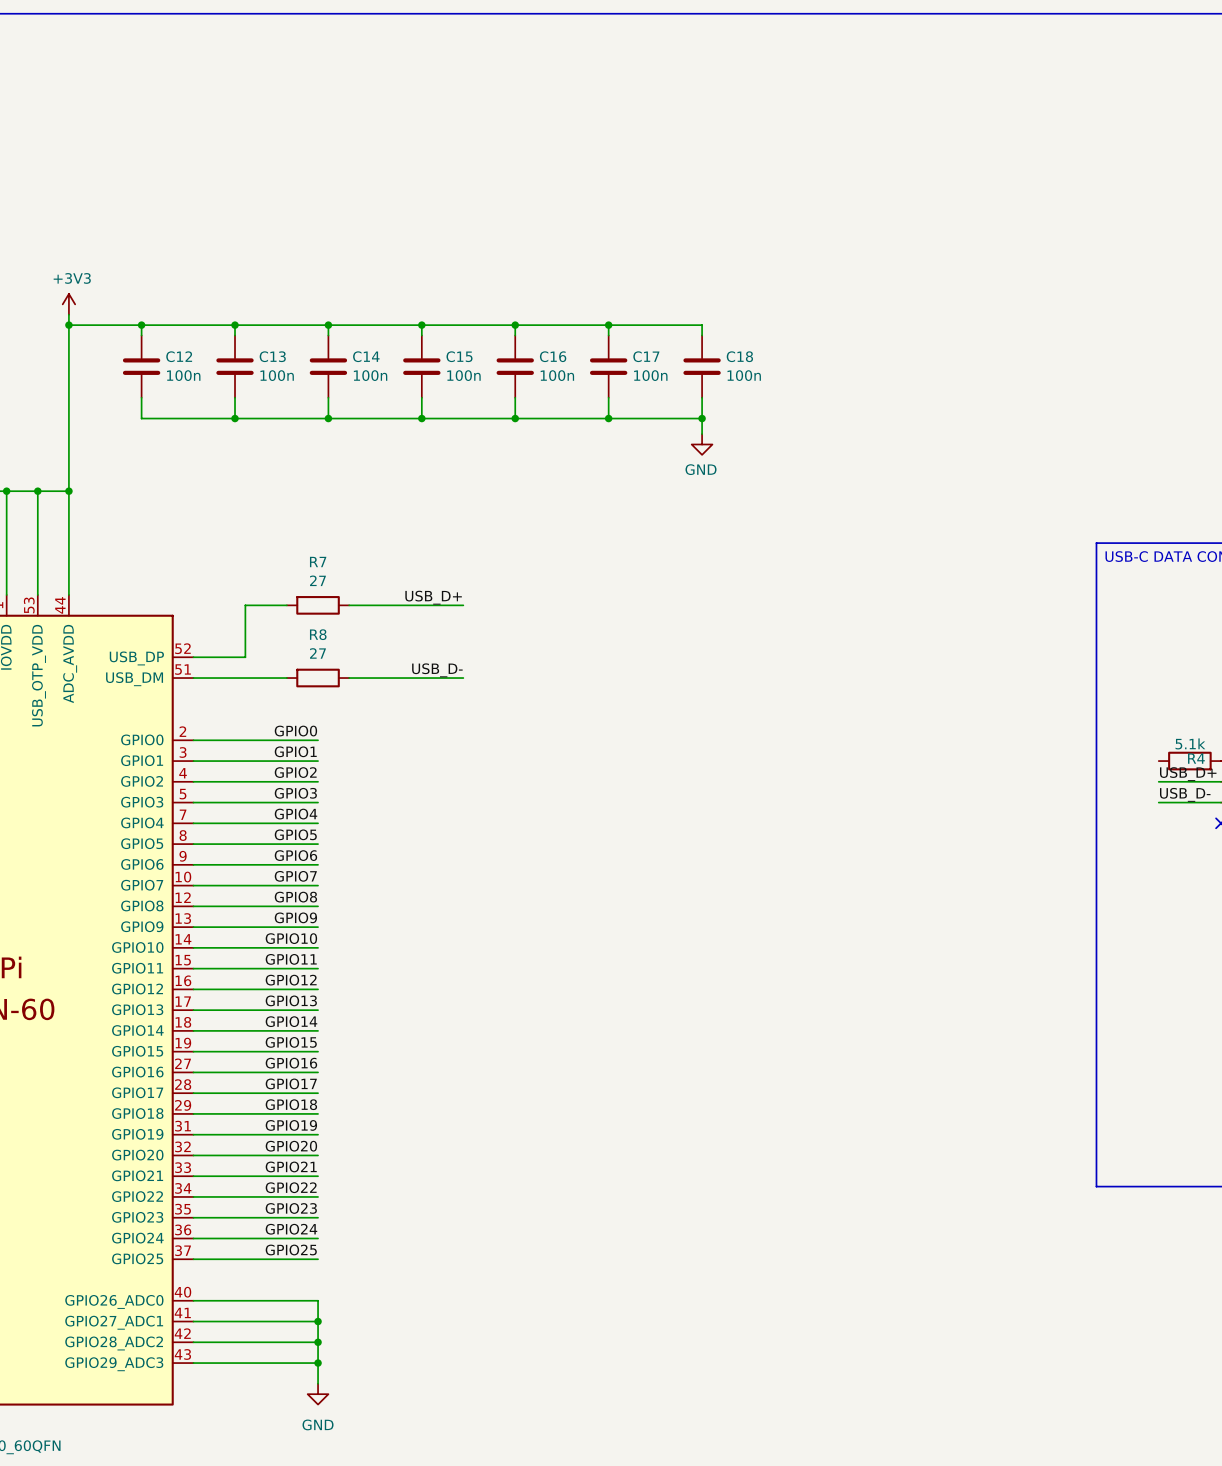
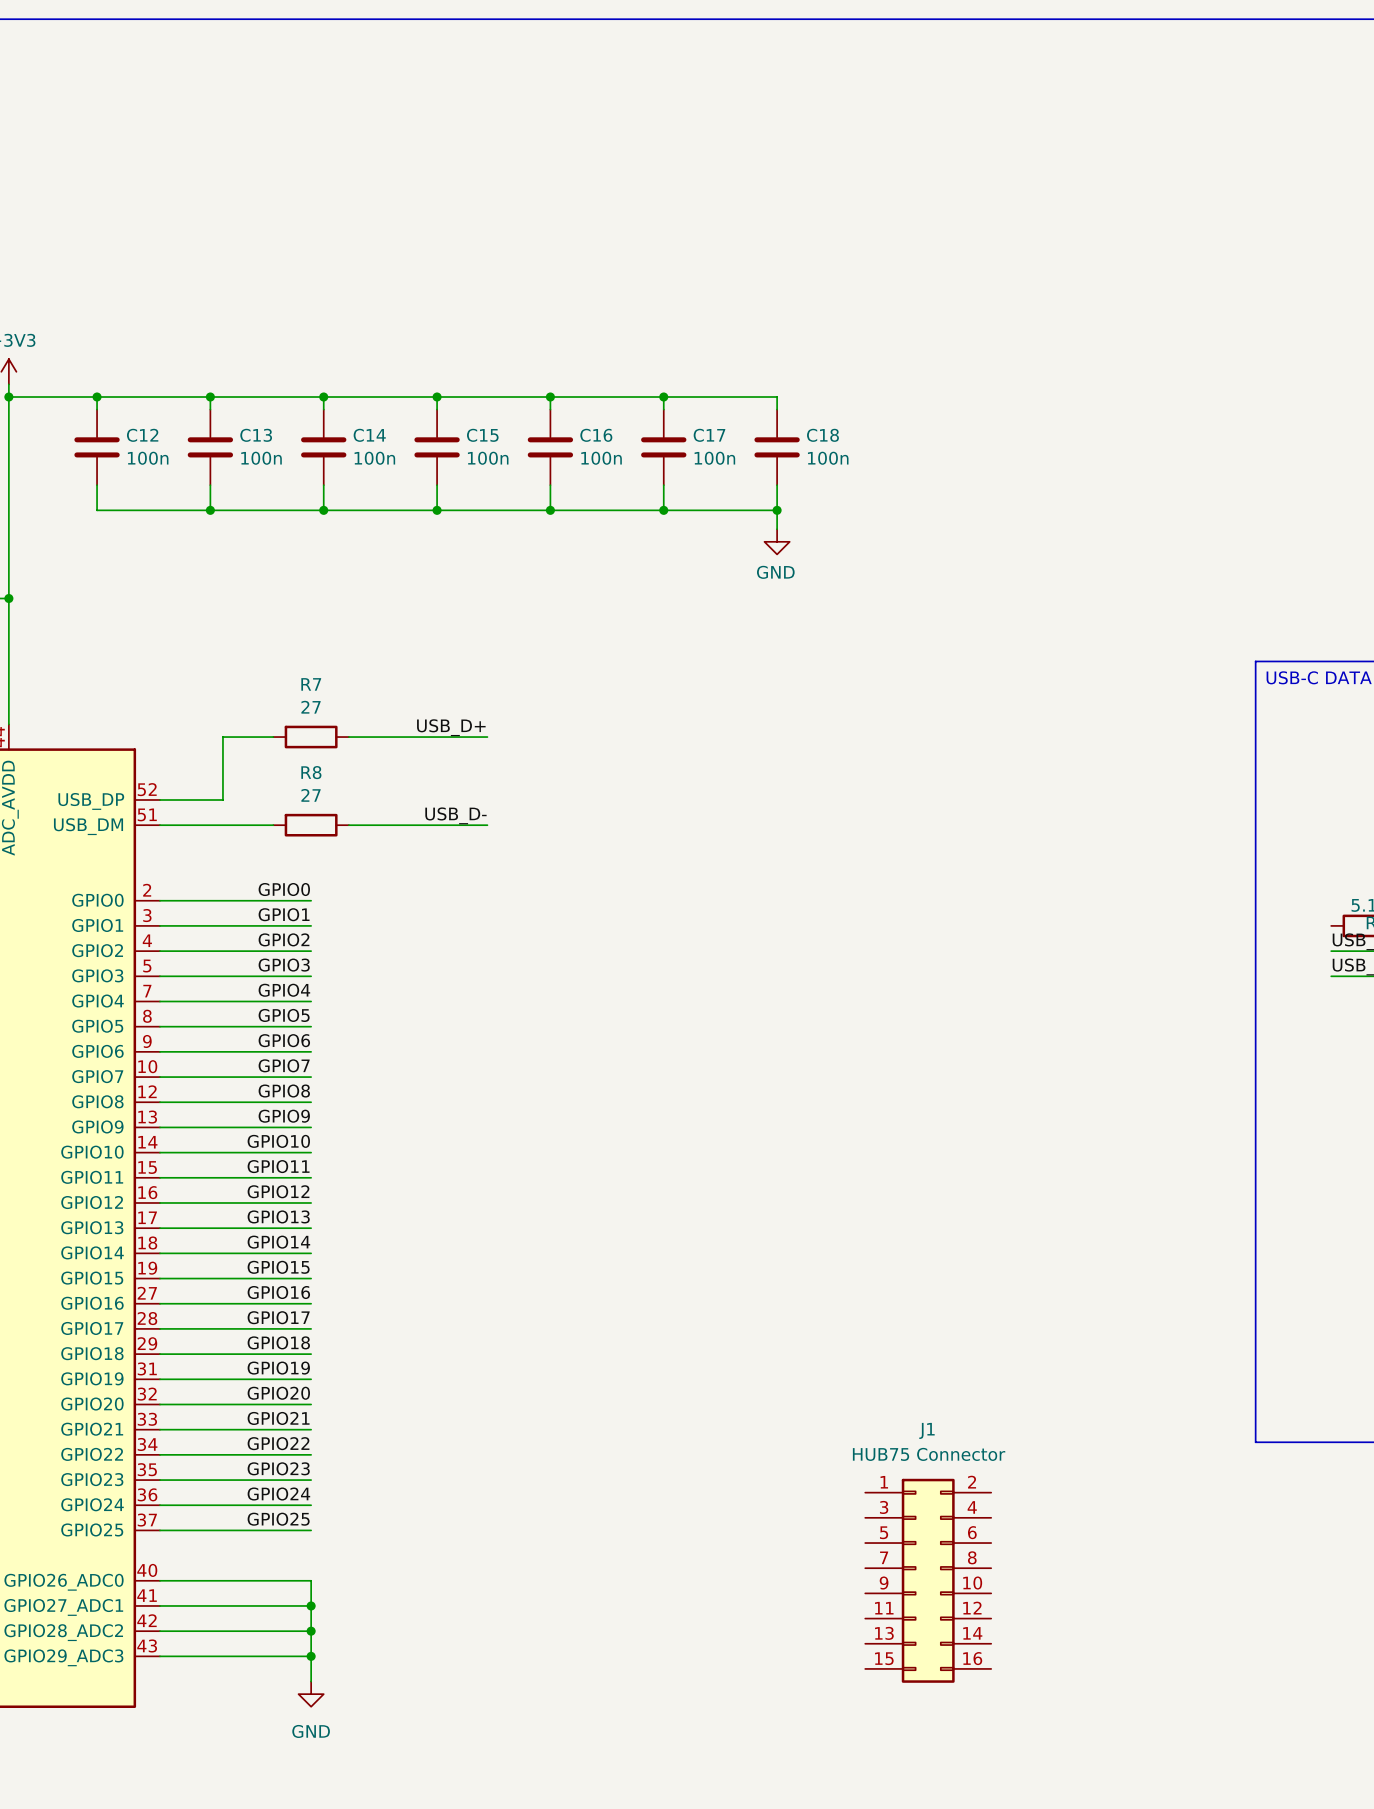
J1: none -> HUB75 Connector (928, 1580)

